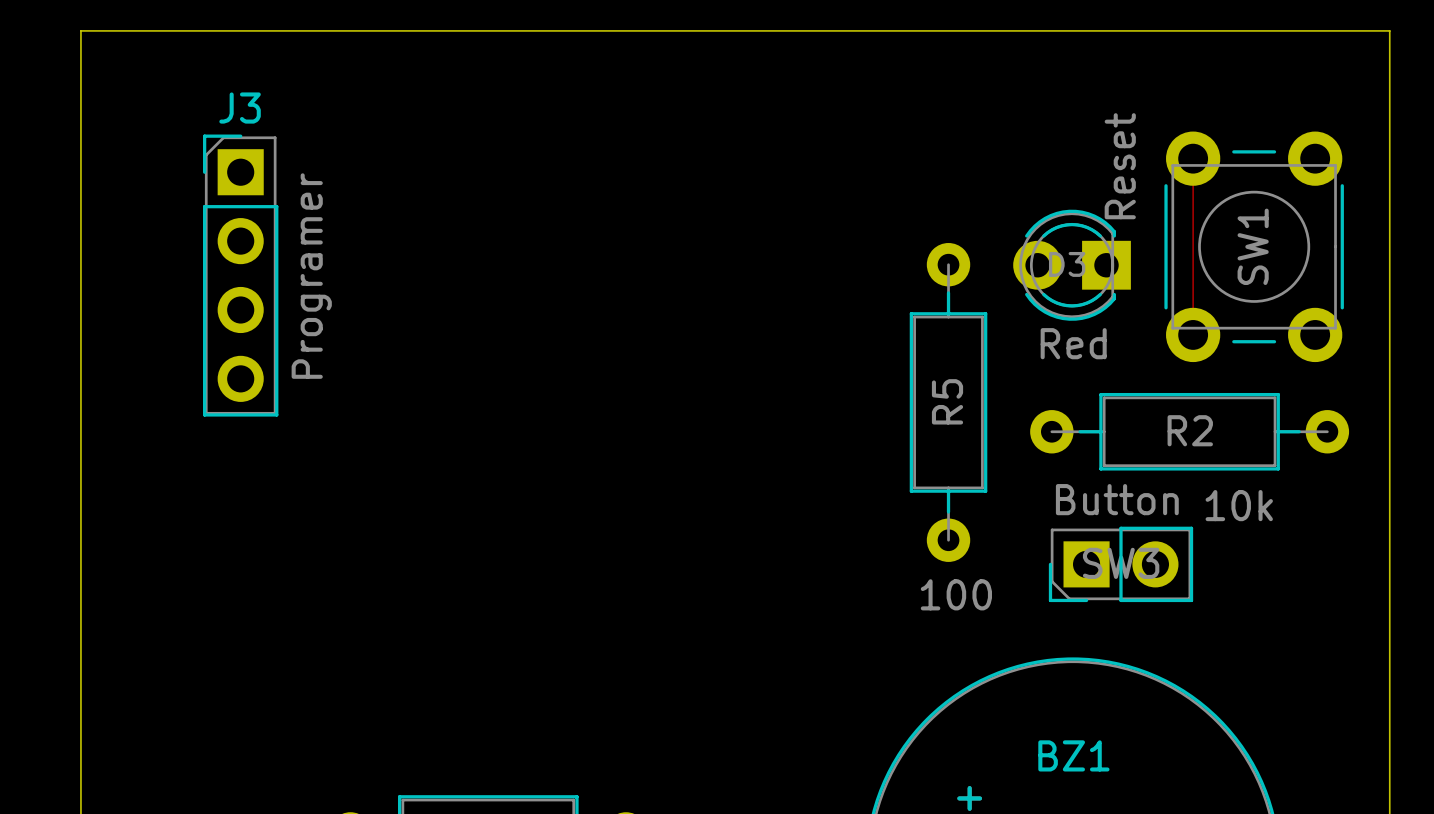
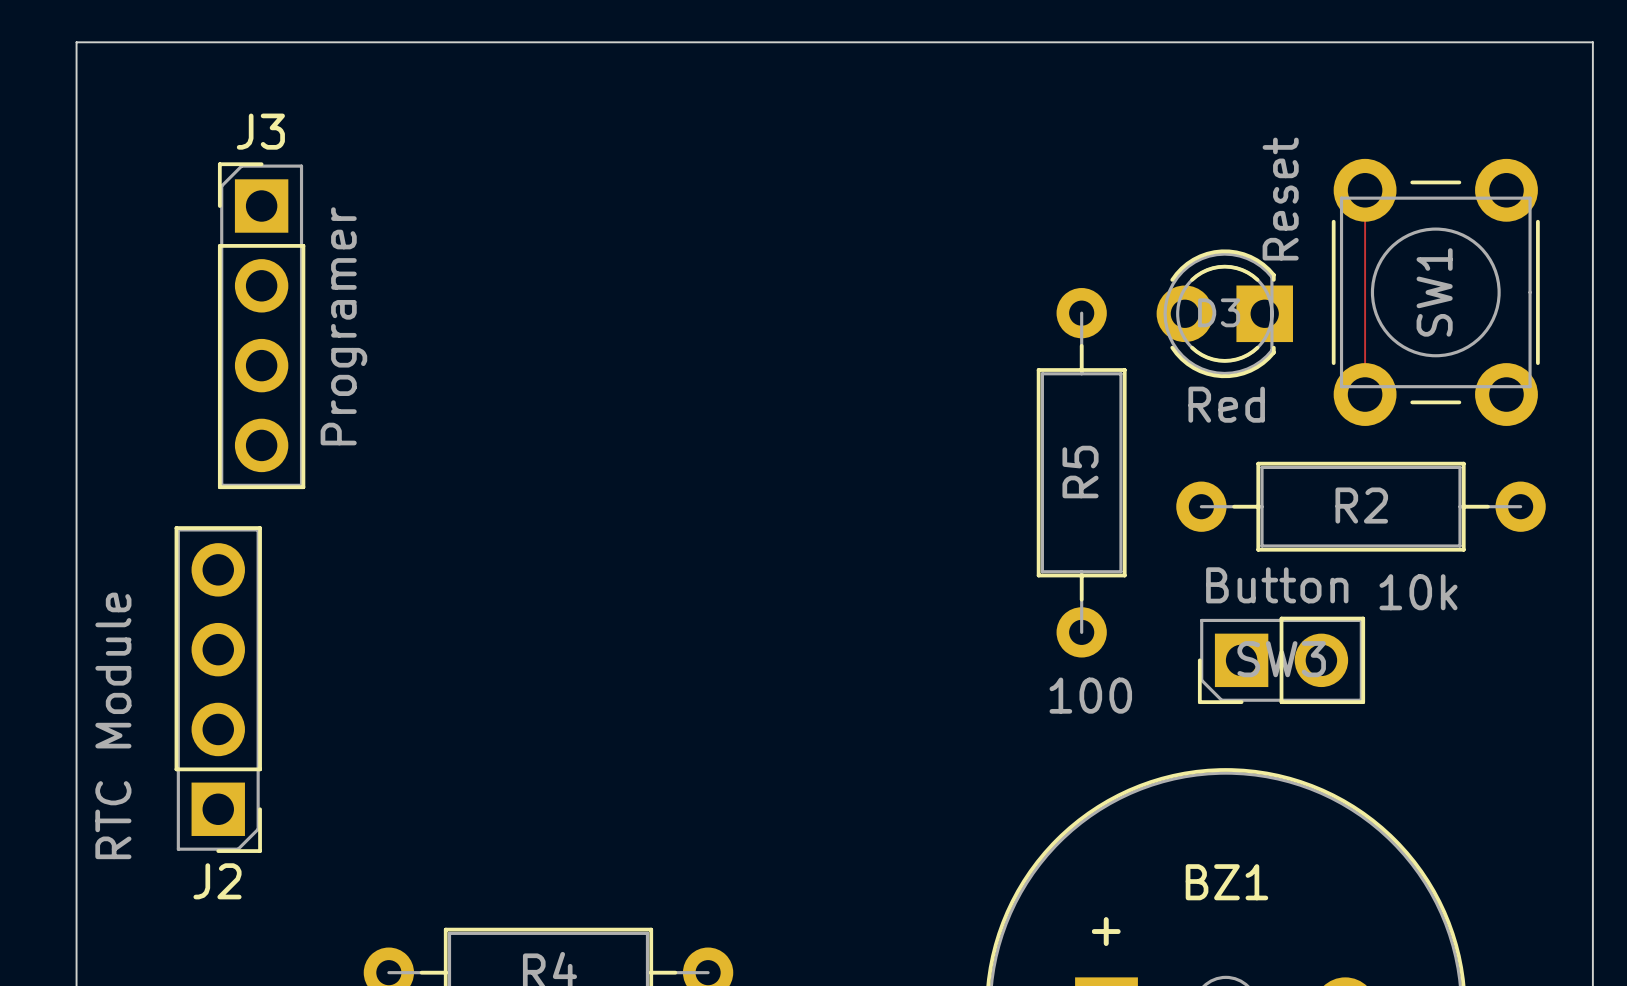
J2: none -> RTC Module (218, 689)

